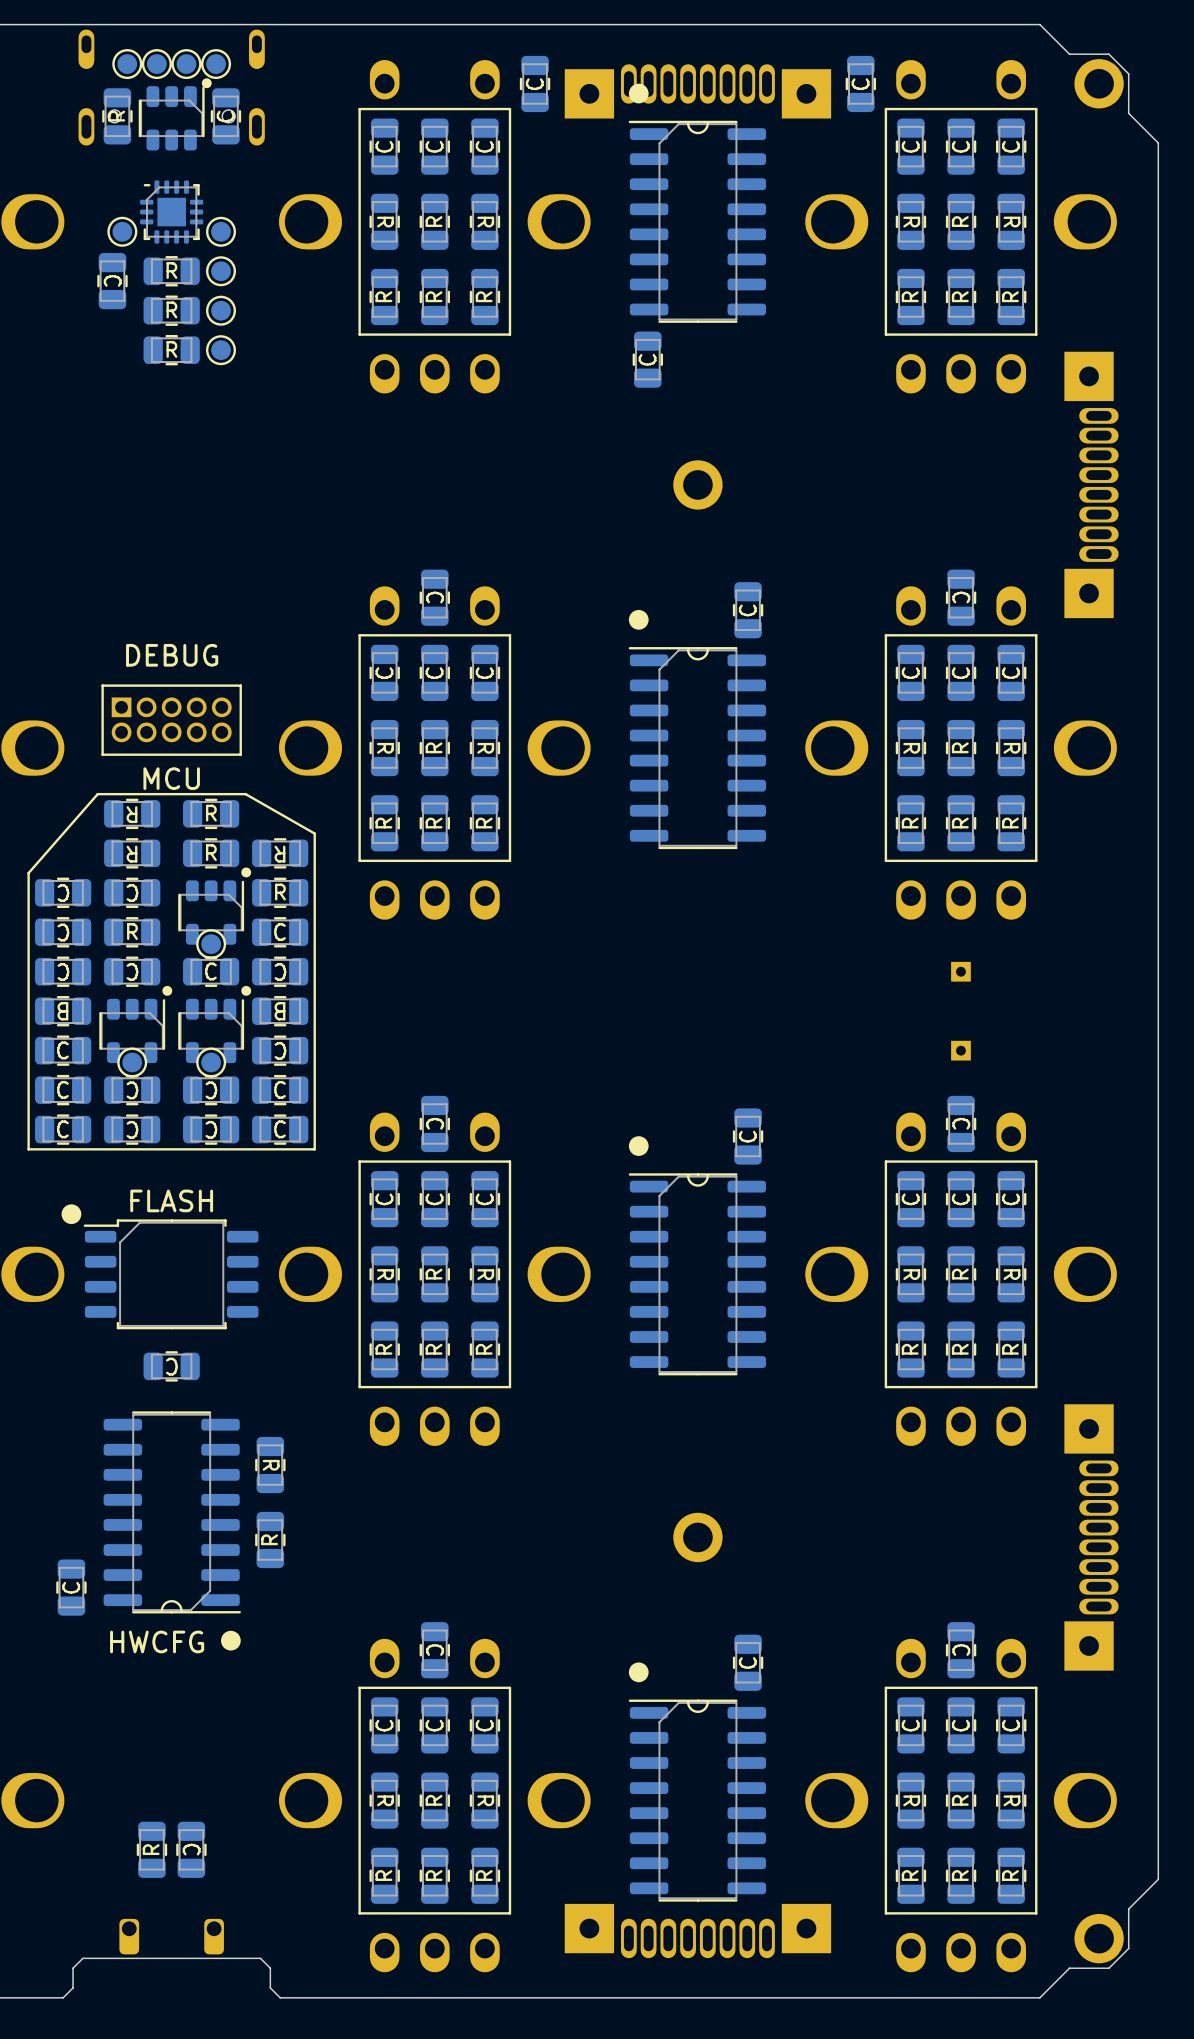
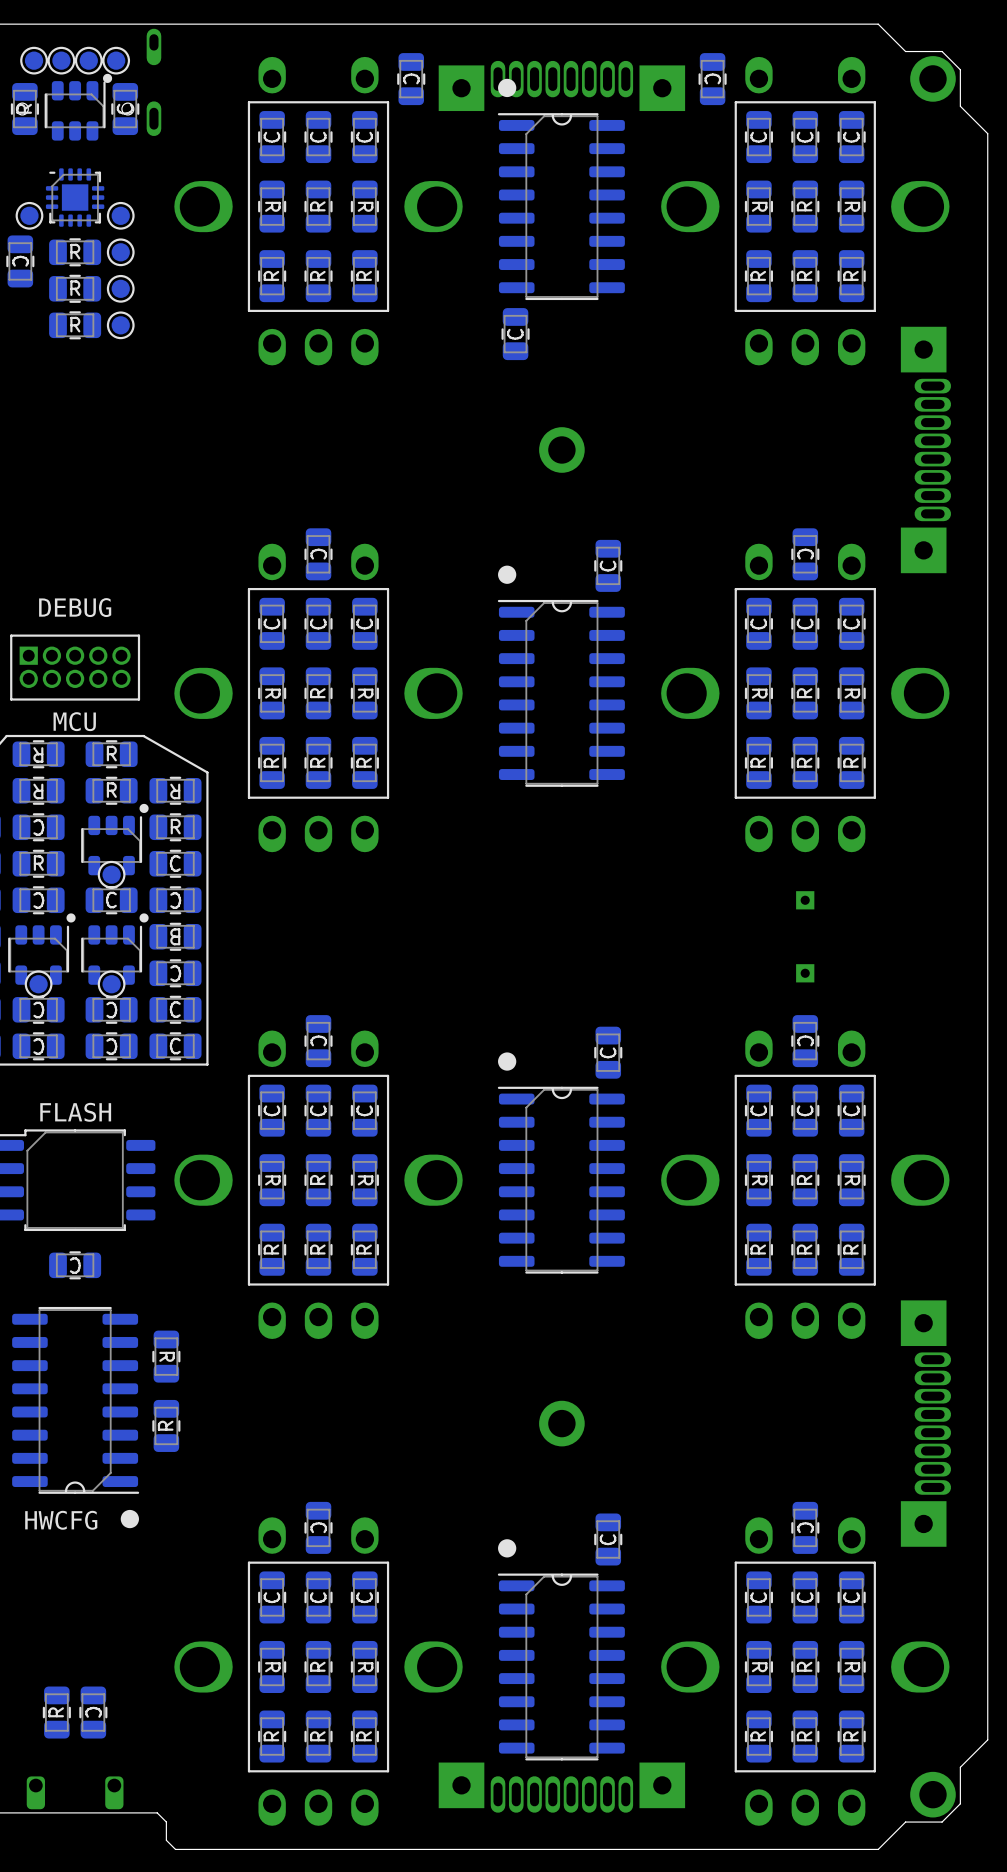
part rotation: 0° (535, 83) -> 180° (411, 79)
part rotation: 0° (860, 83) -> 180° (712, 79)

